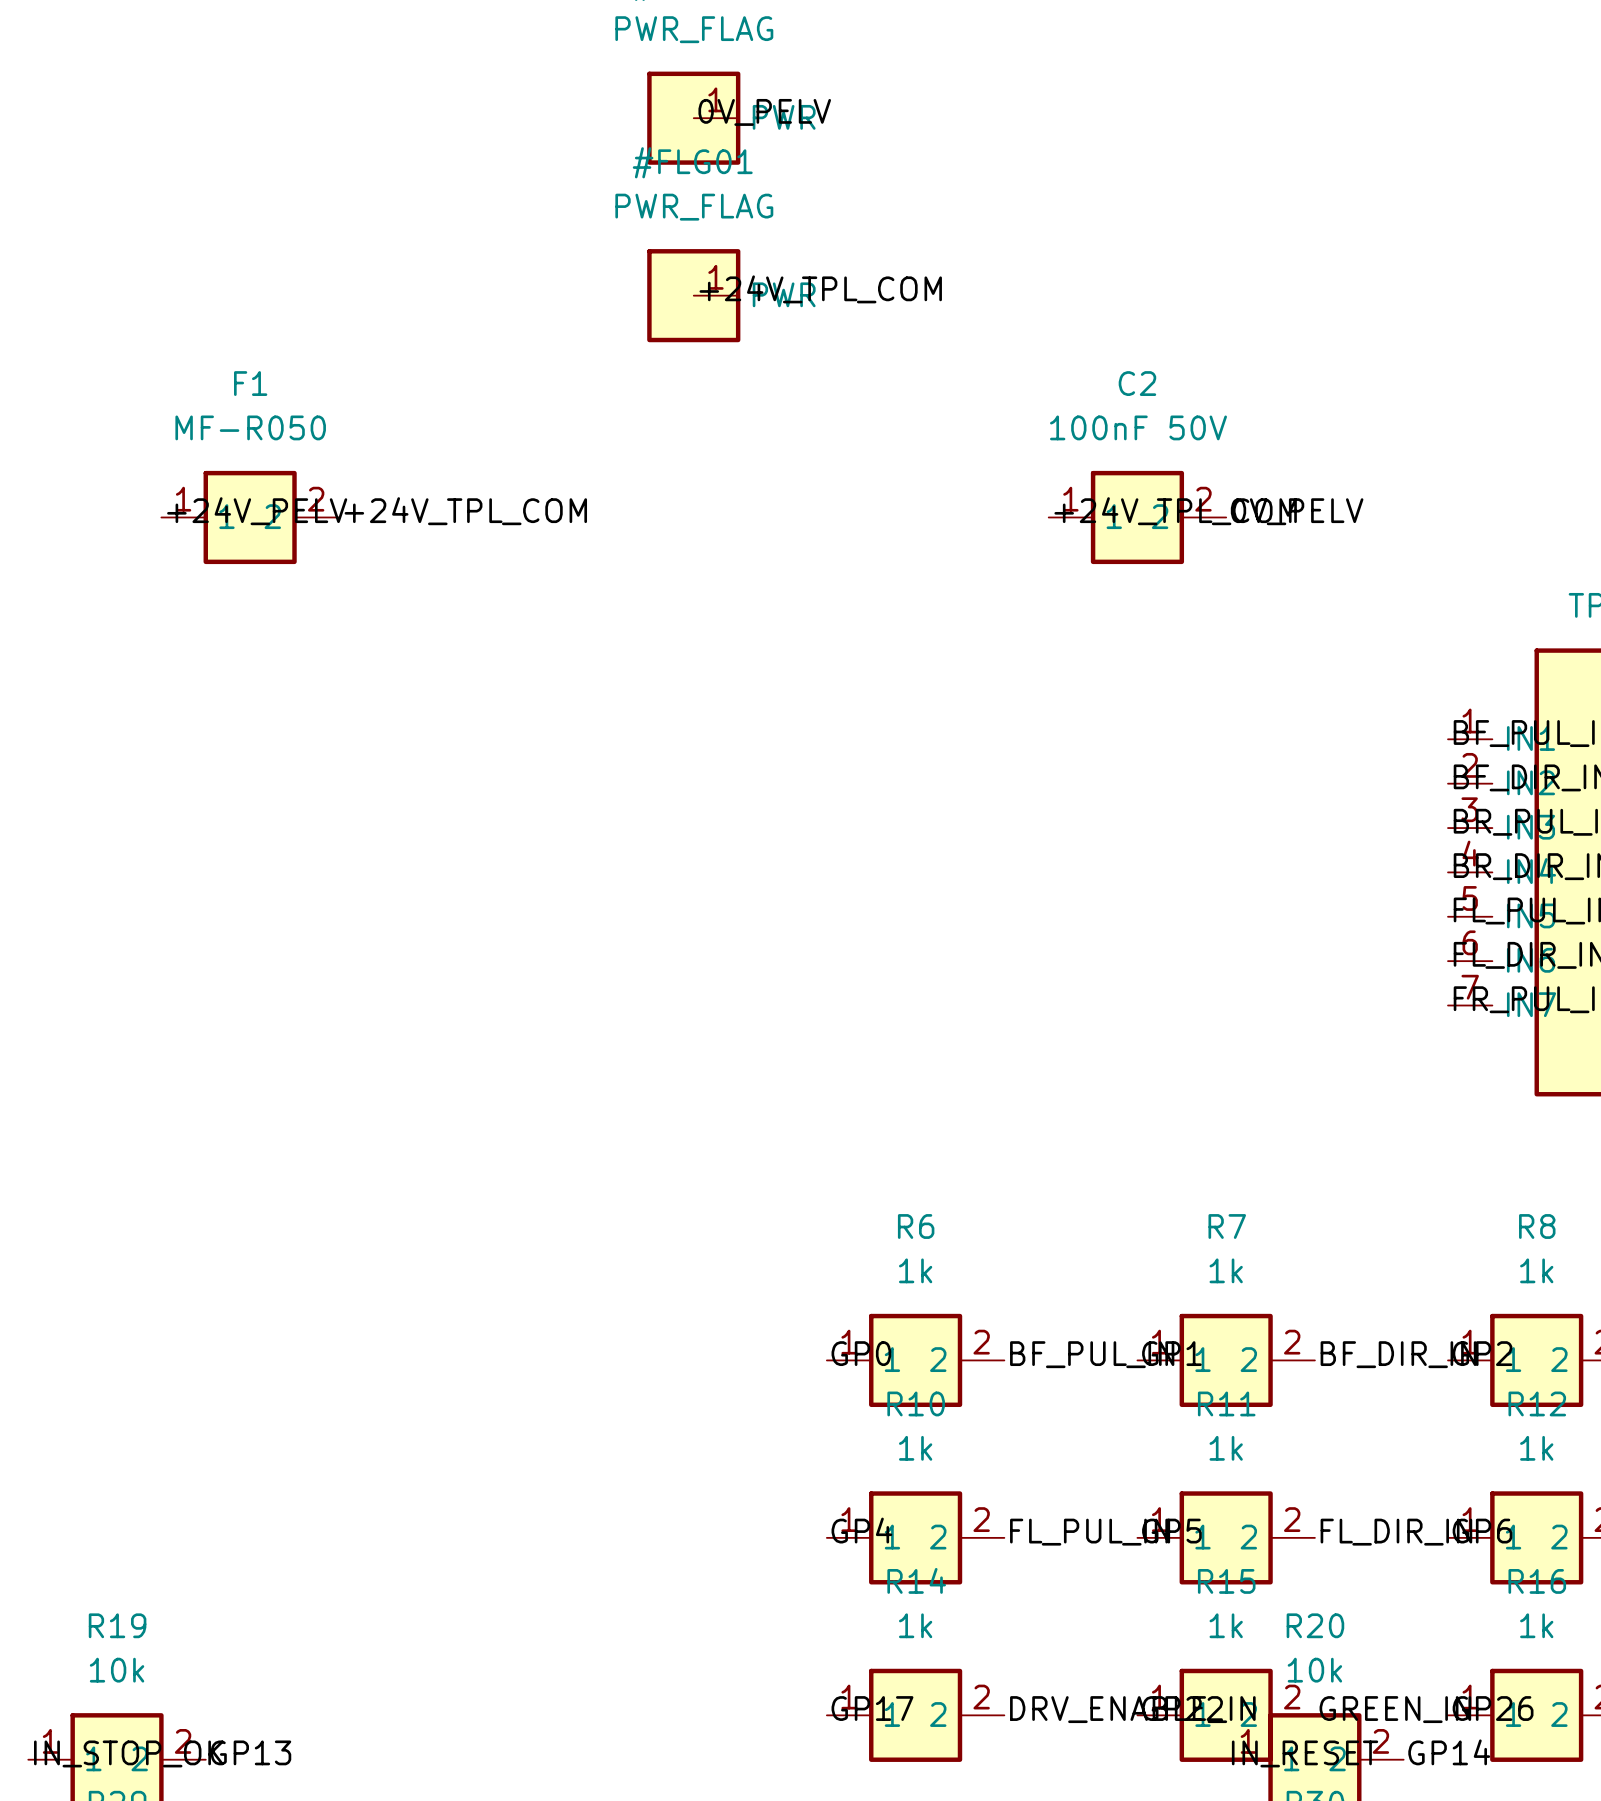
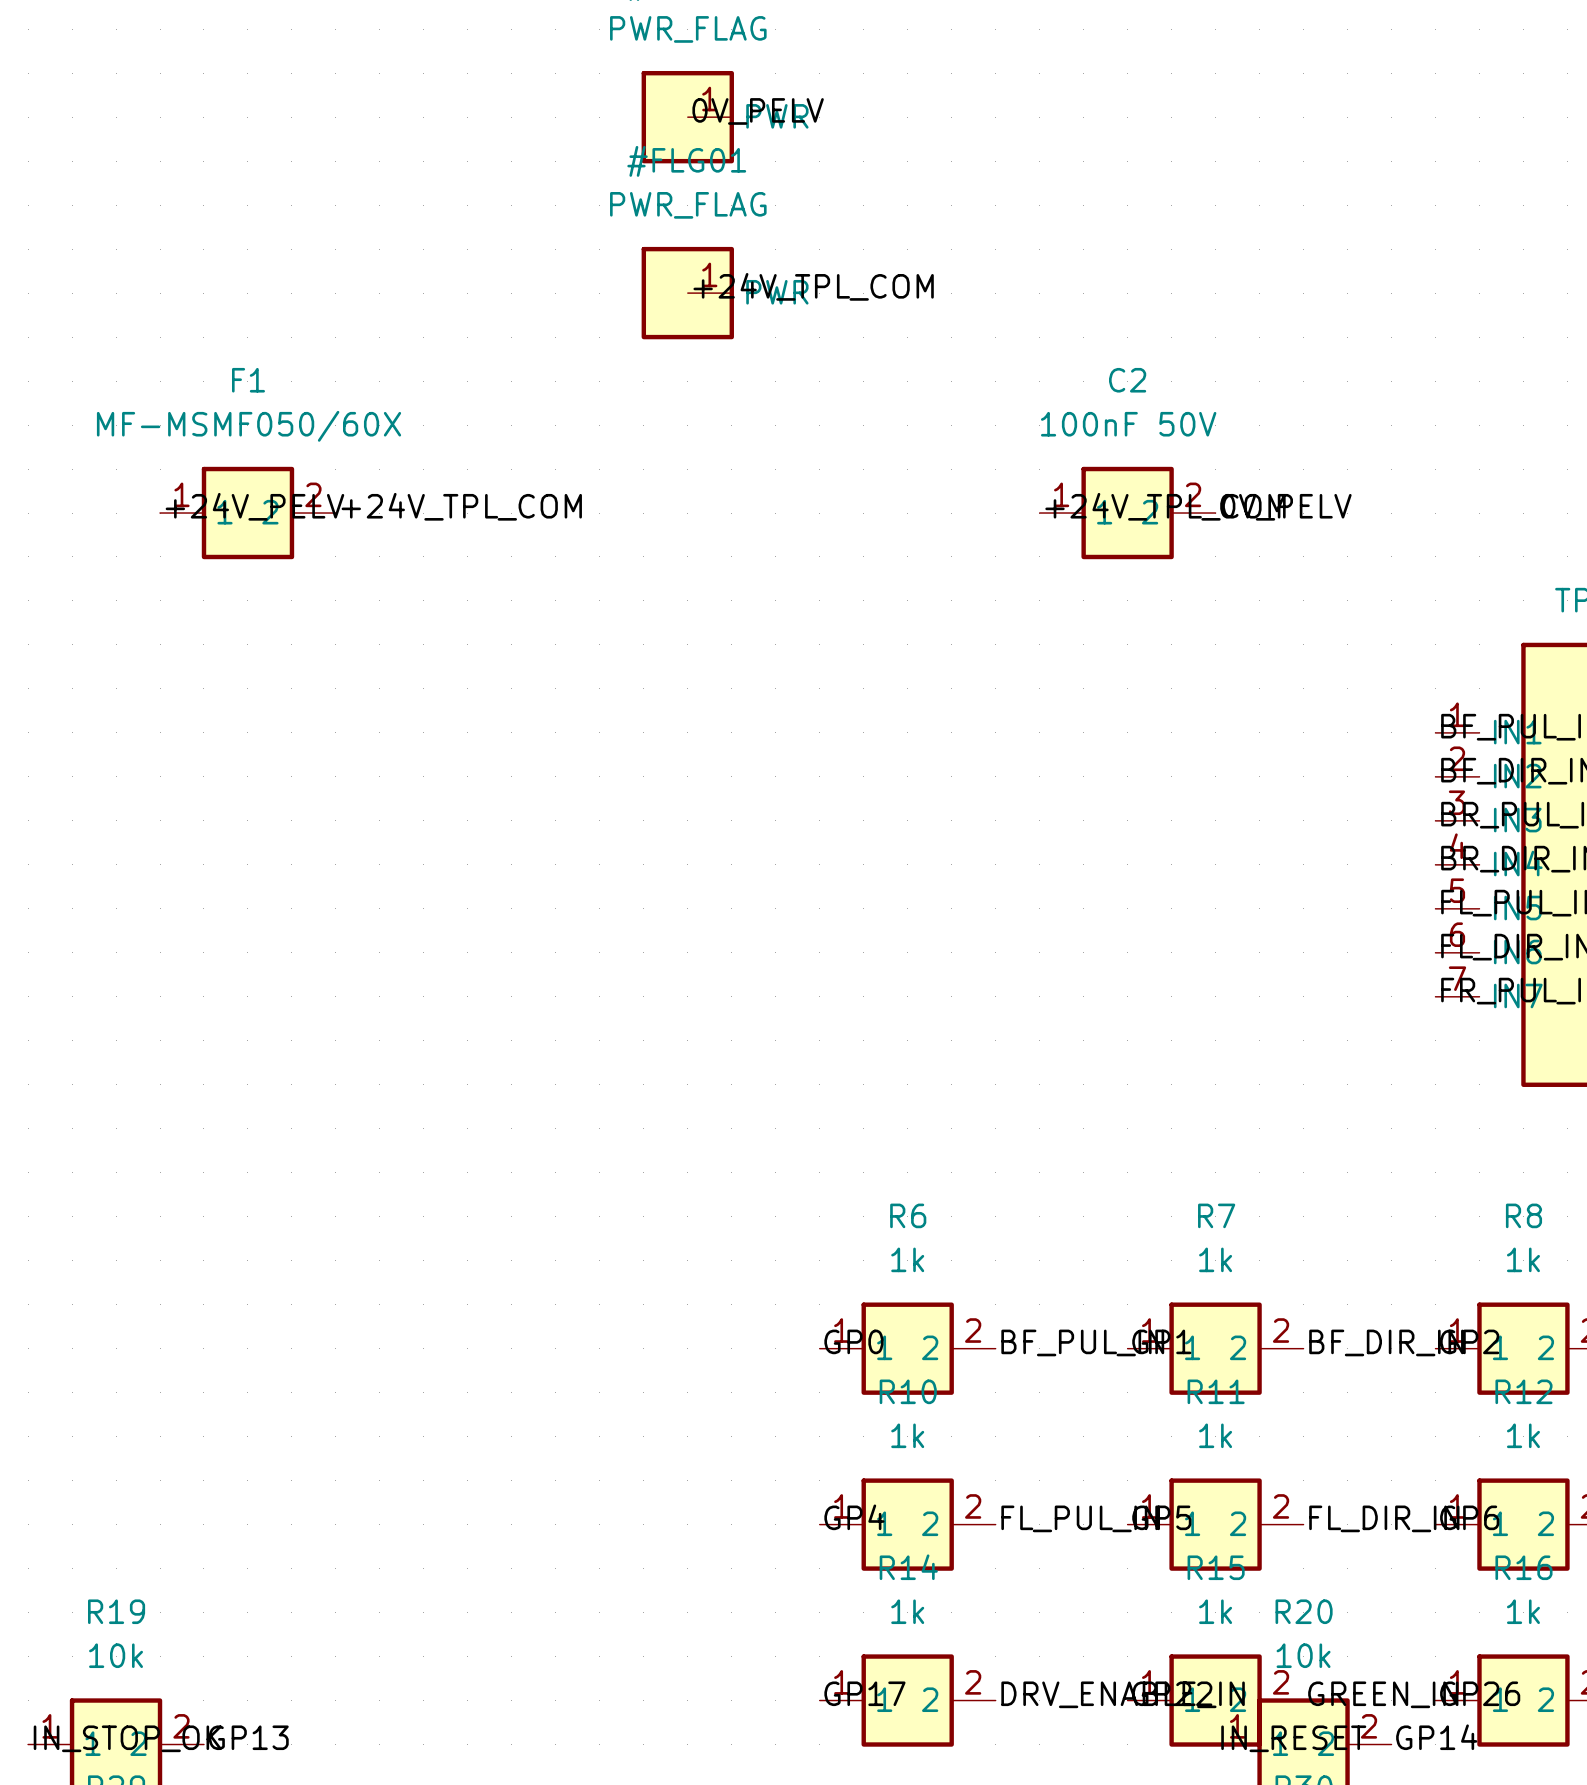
F1 value: MF-R050 (250, 427) -> MF-MSMF050/60X (249, 426)

